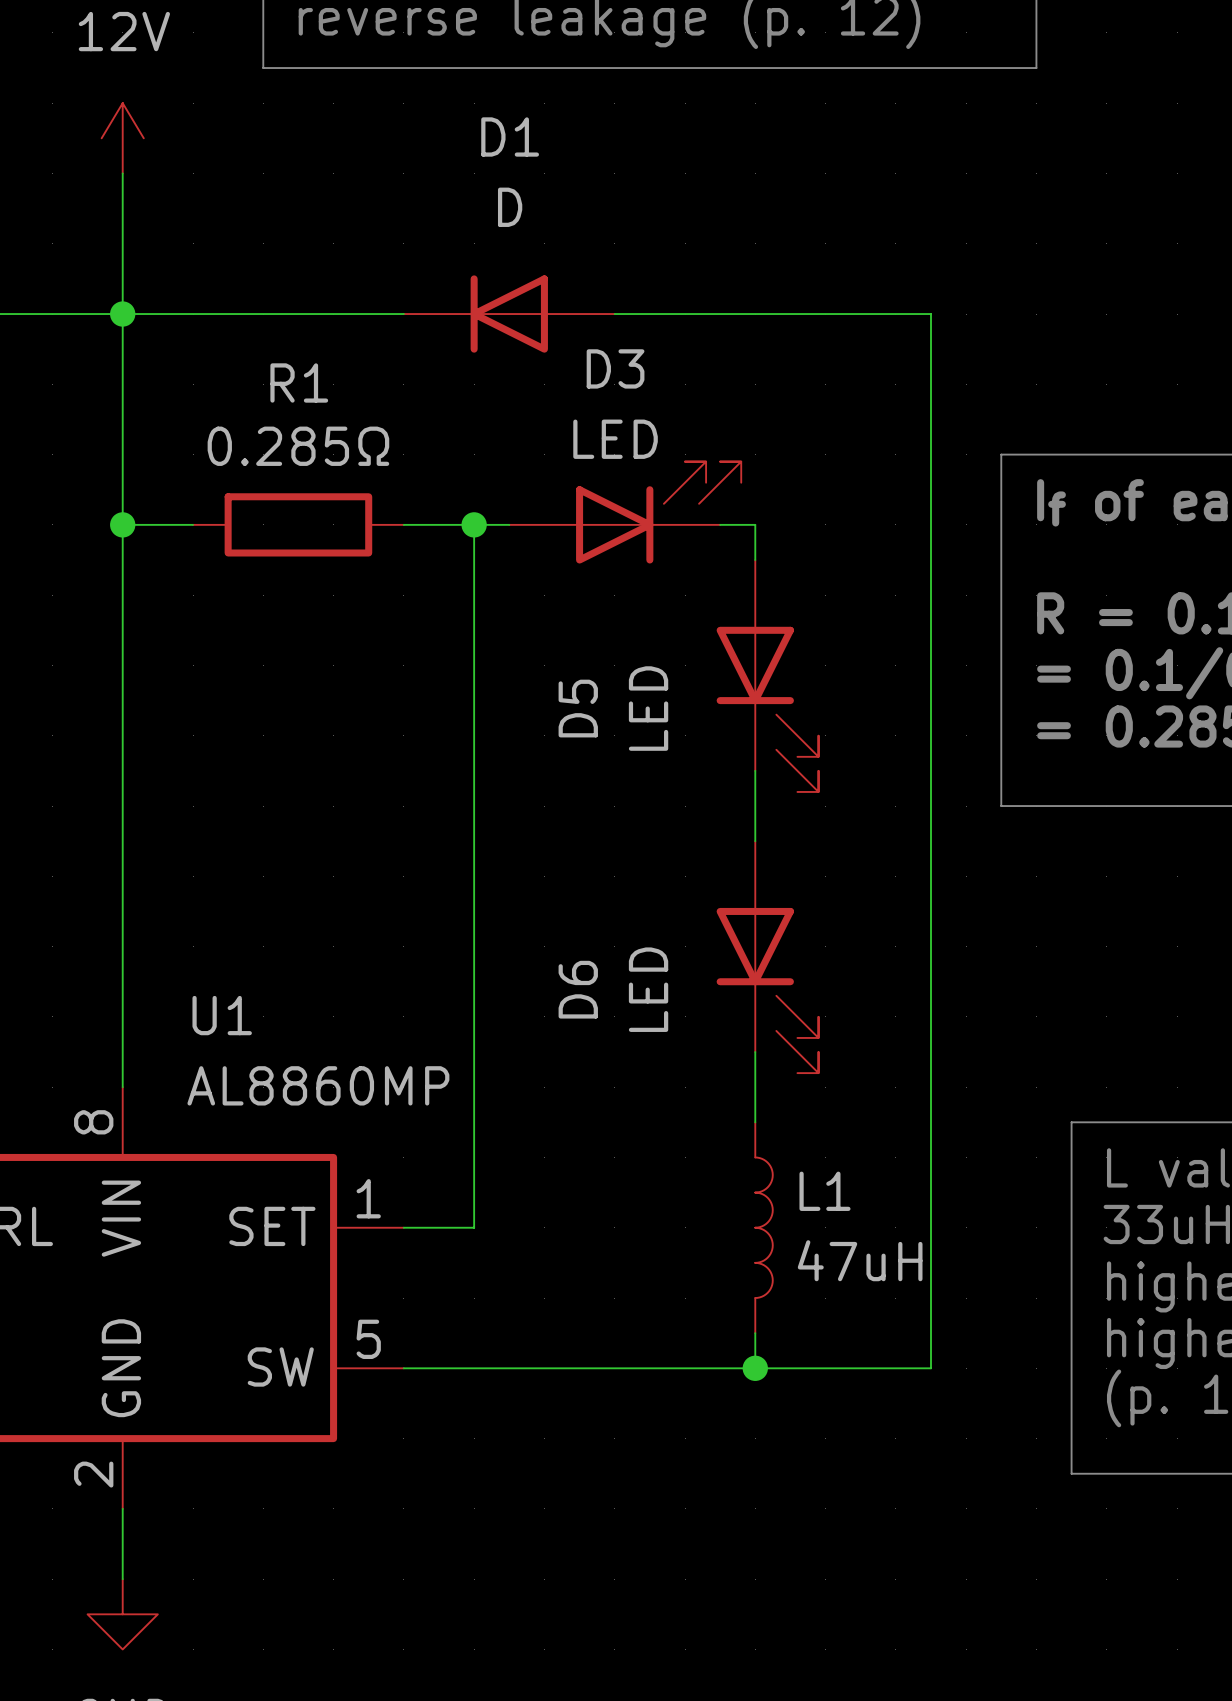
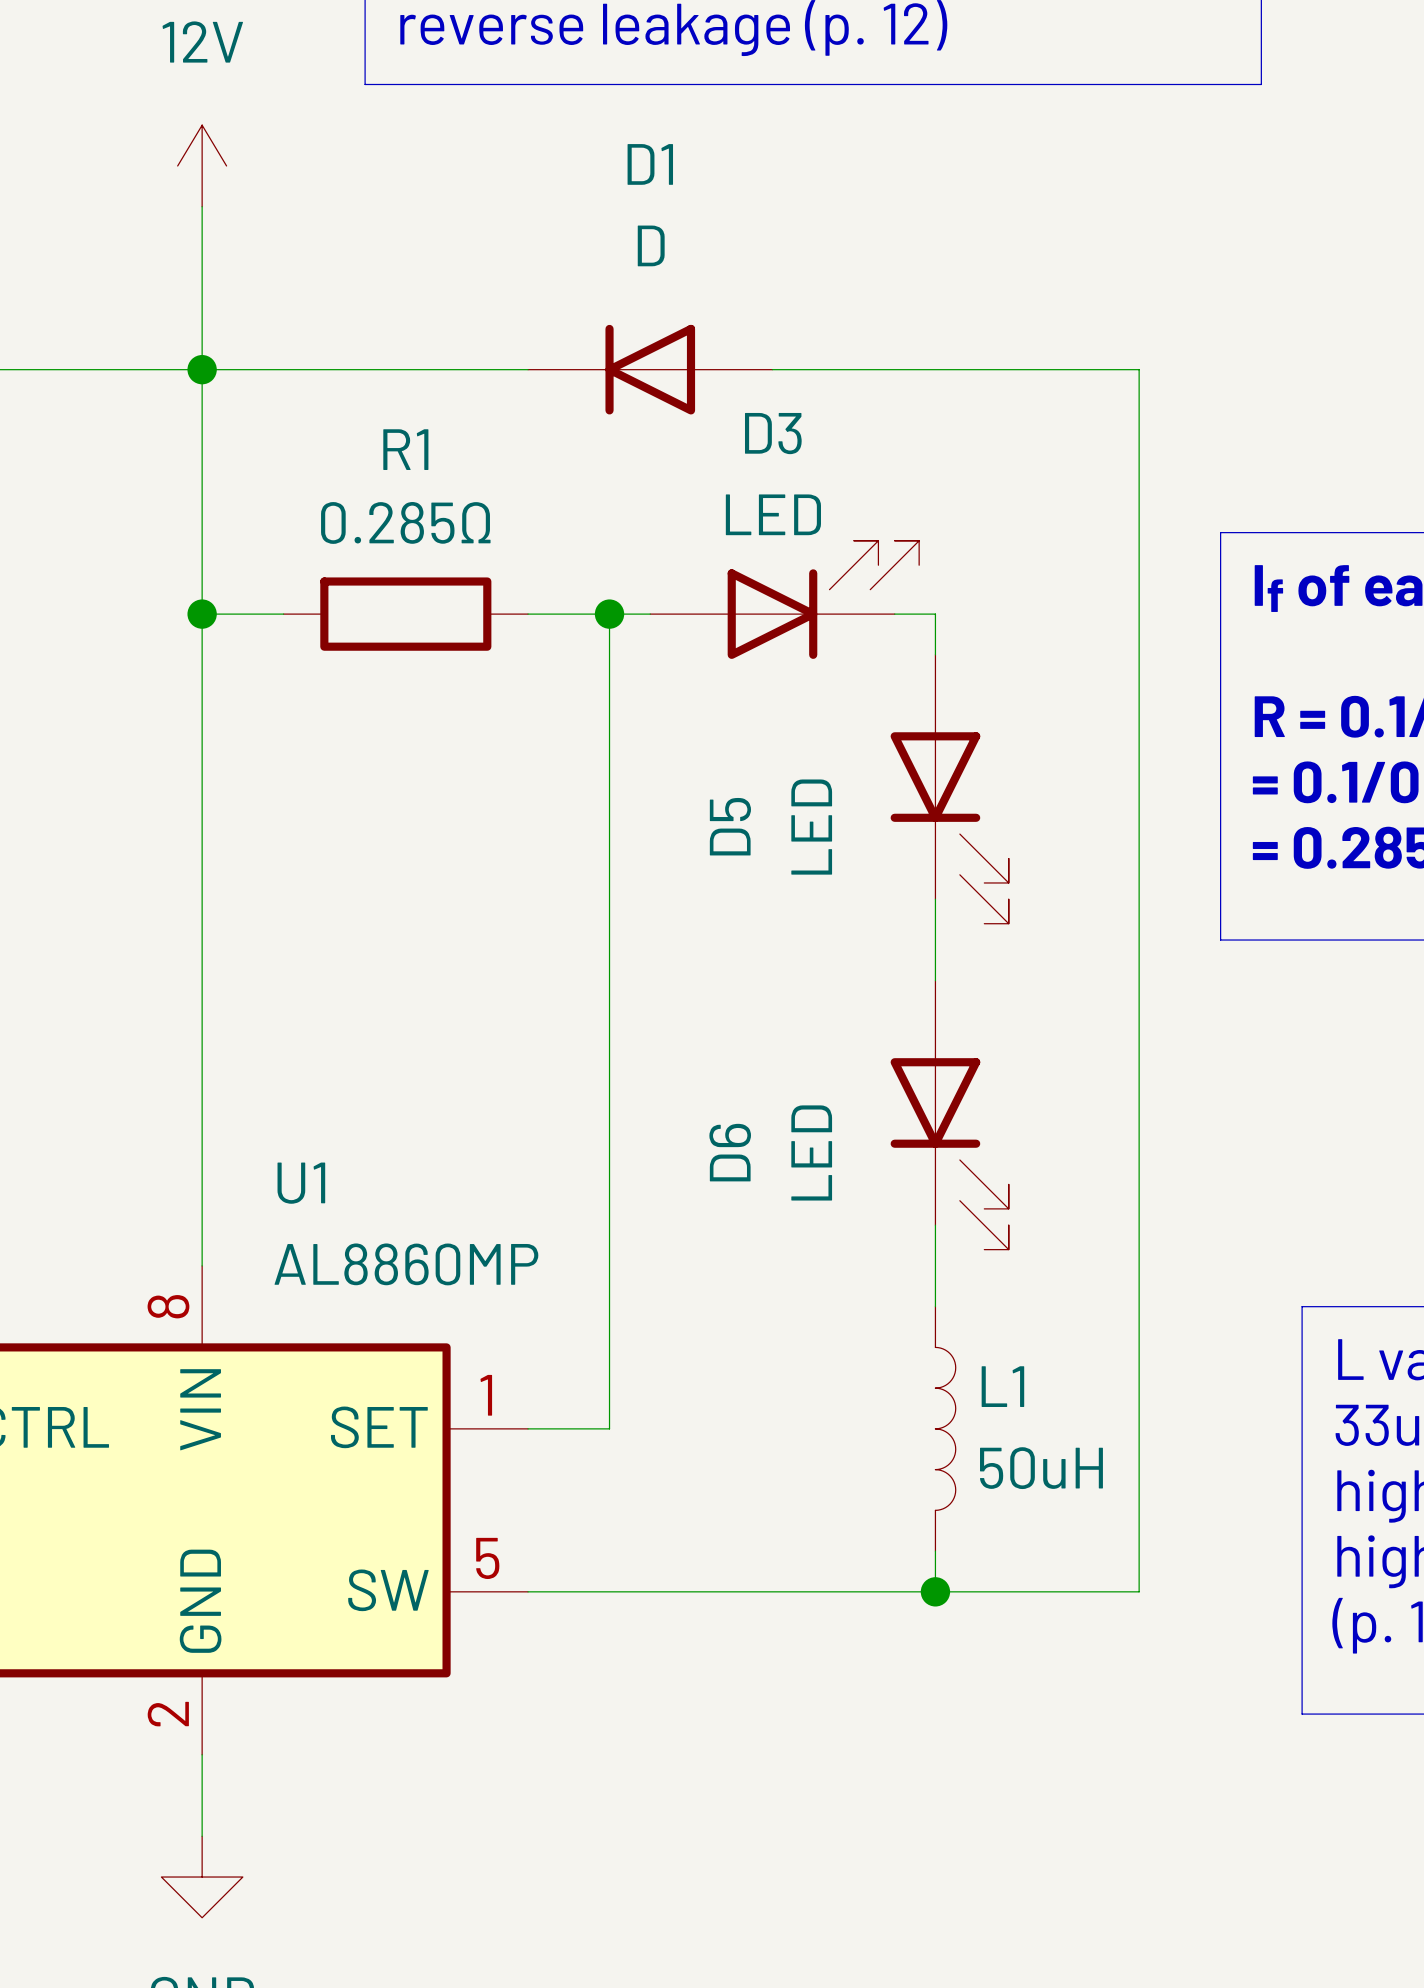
L1 value: 47uH (860, 1260) -> 50uH (1041, 1468)

